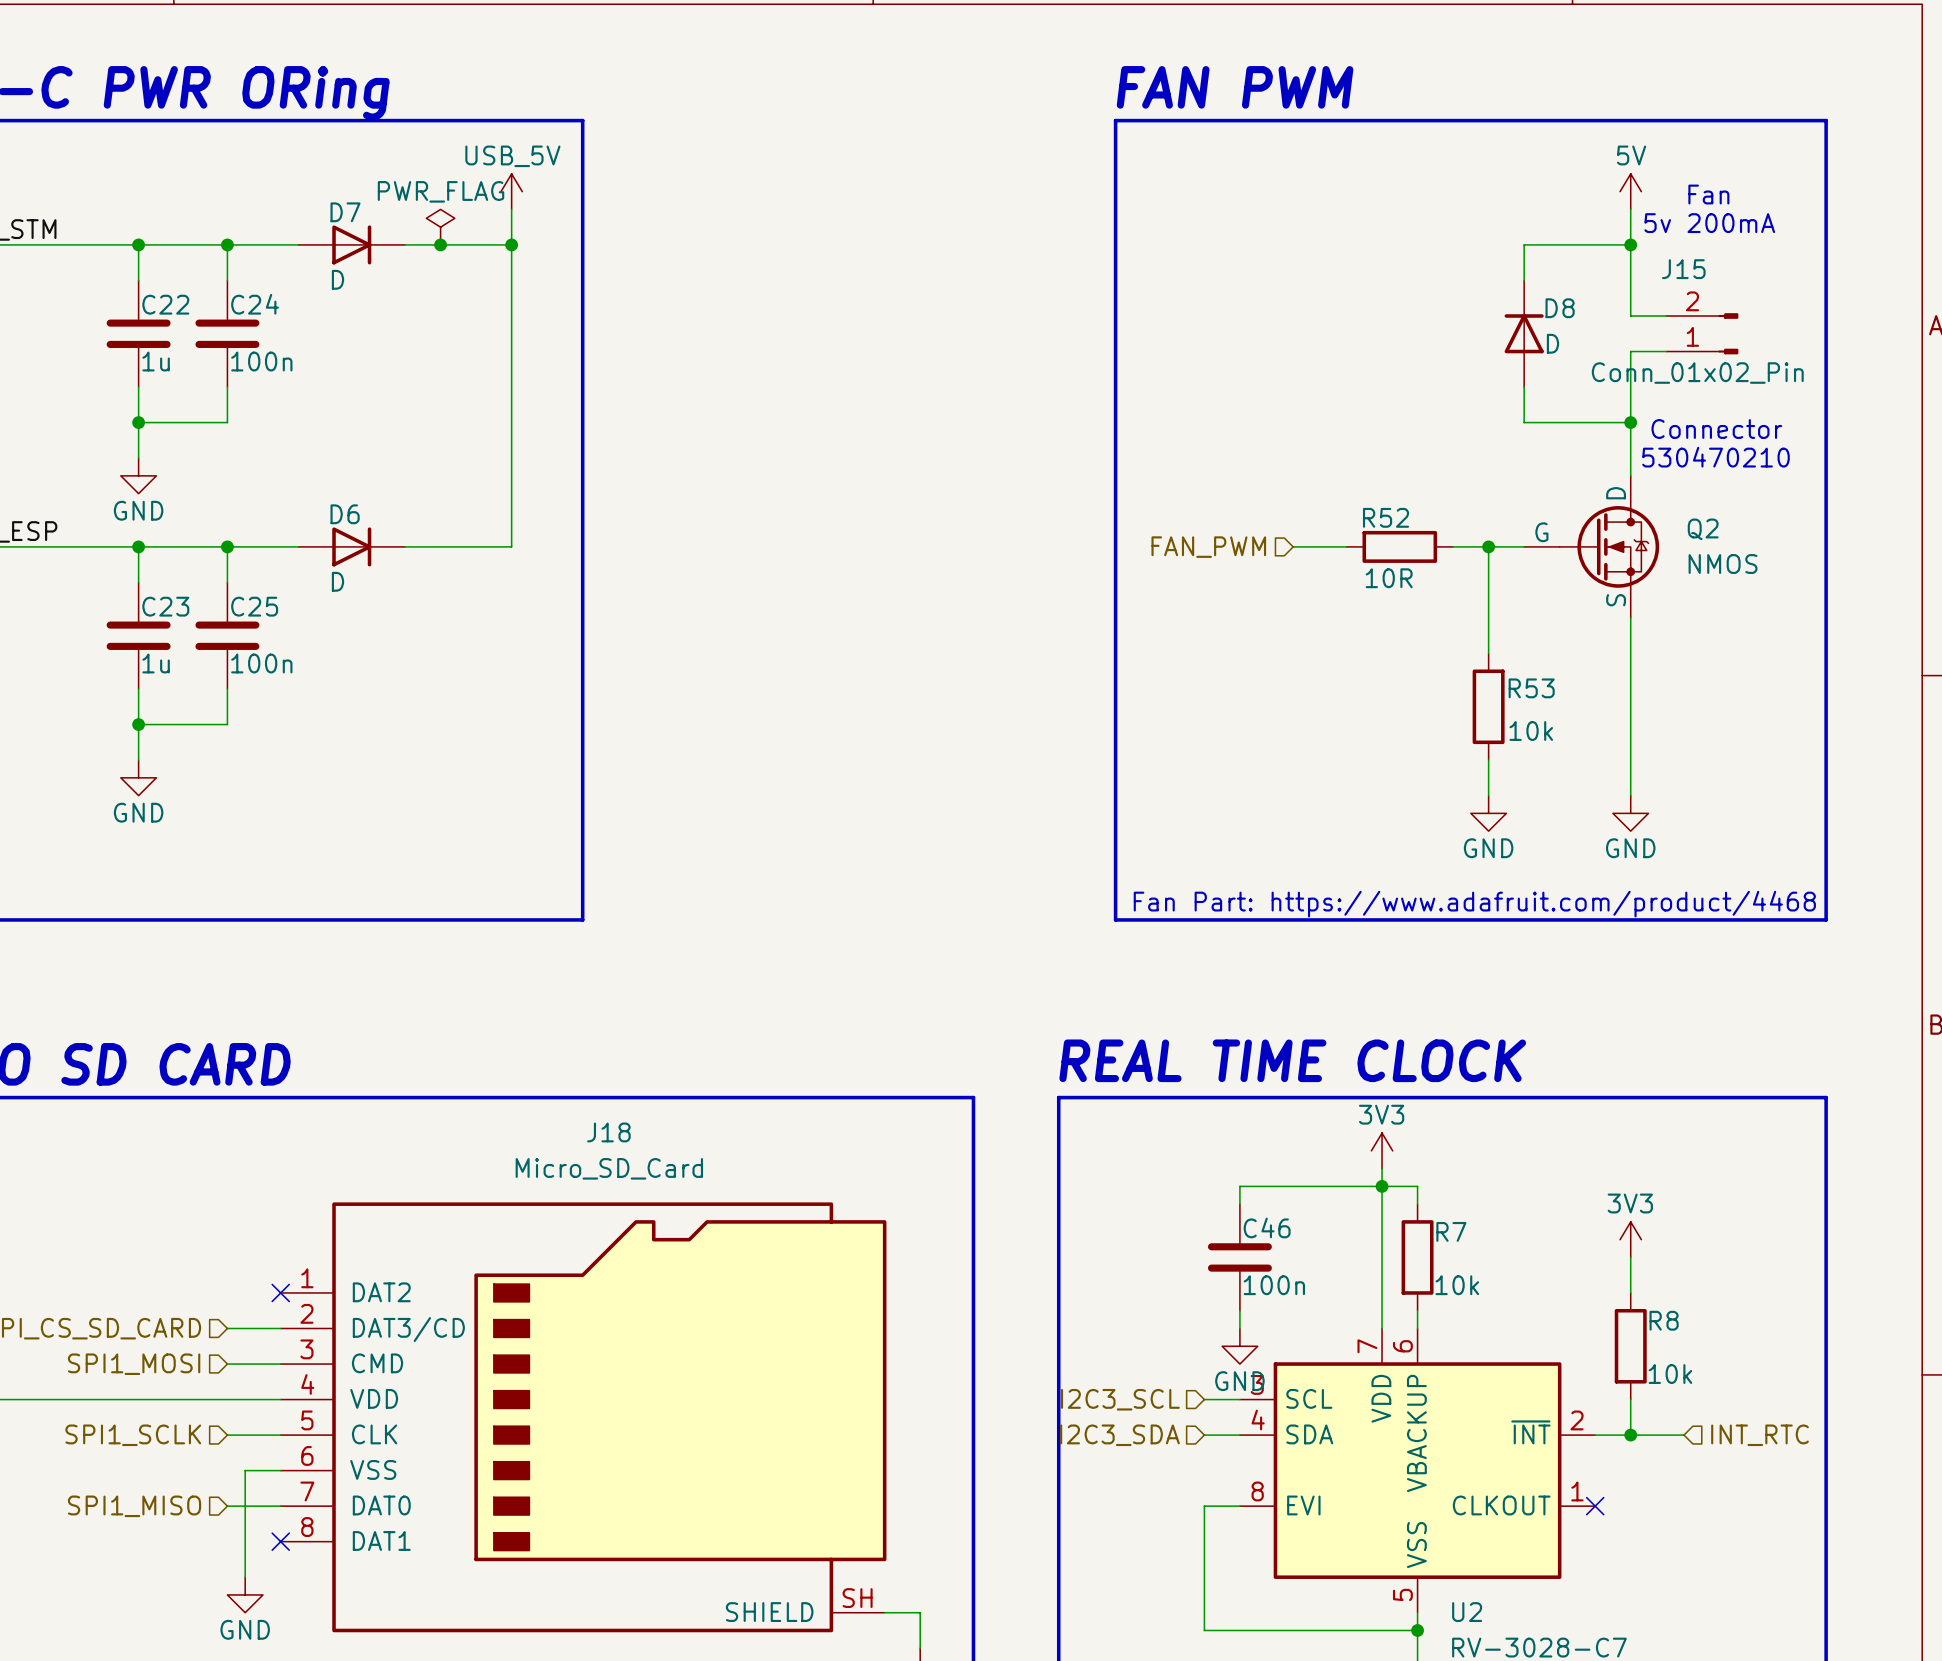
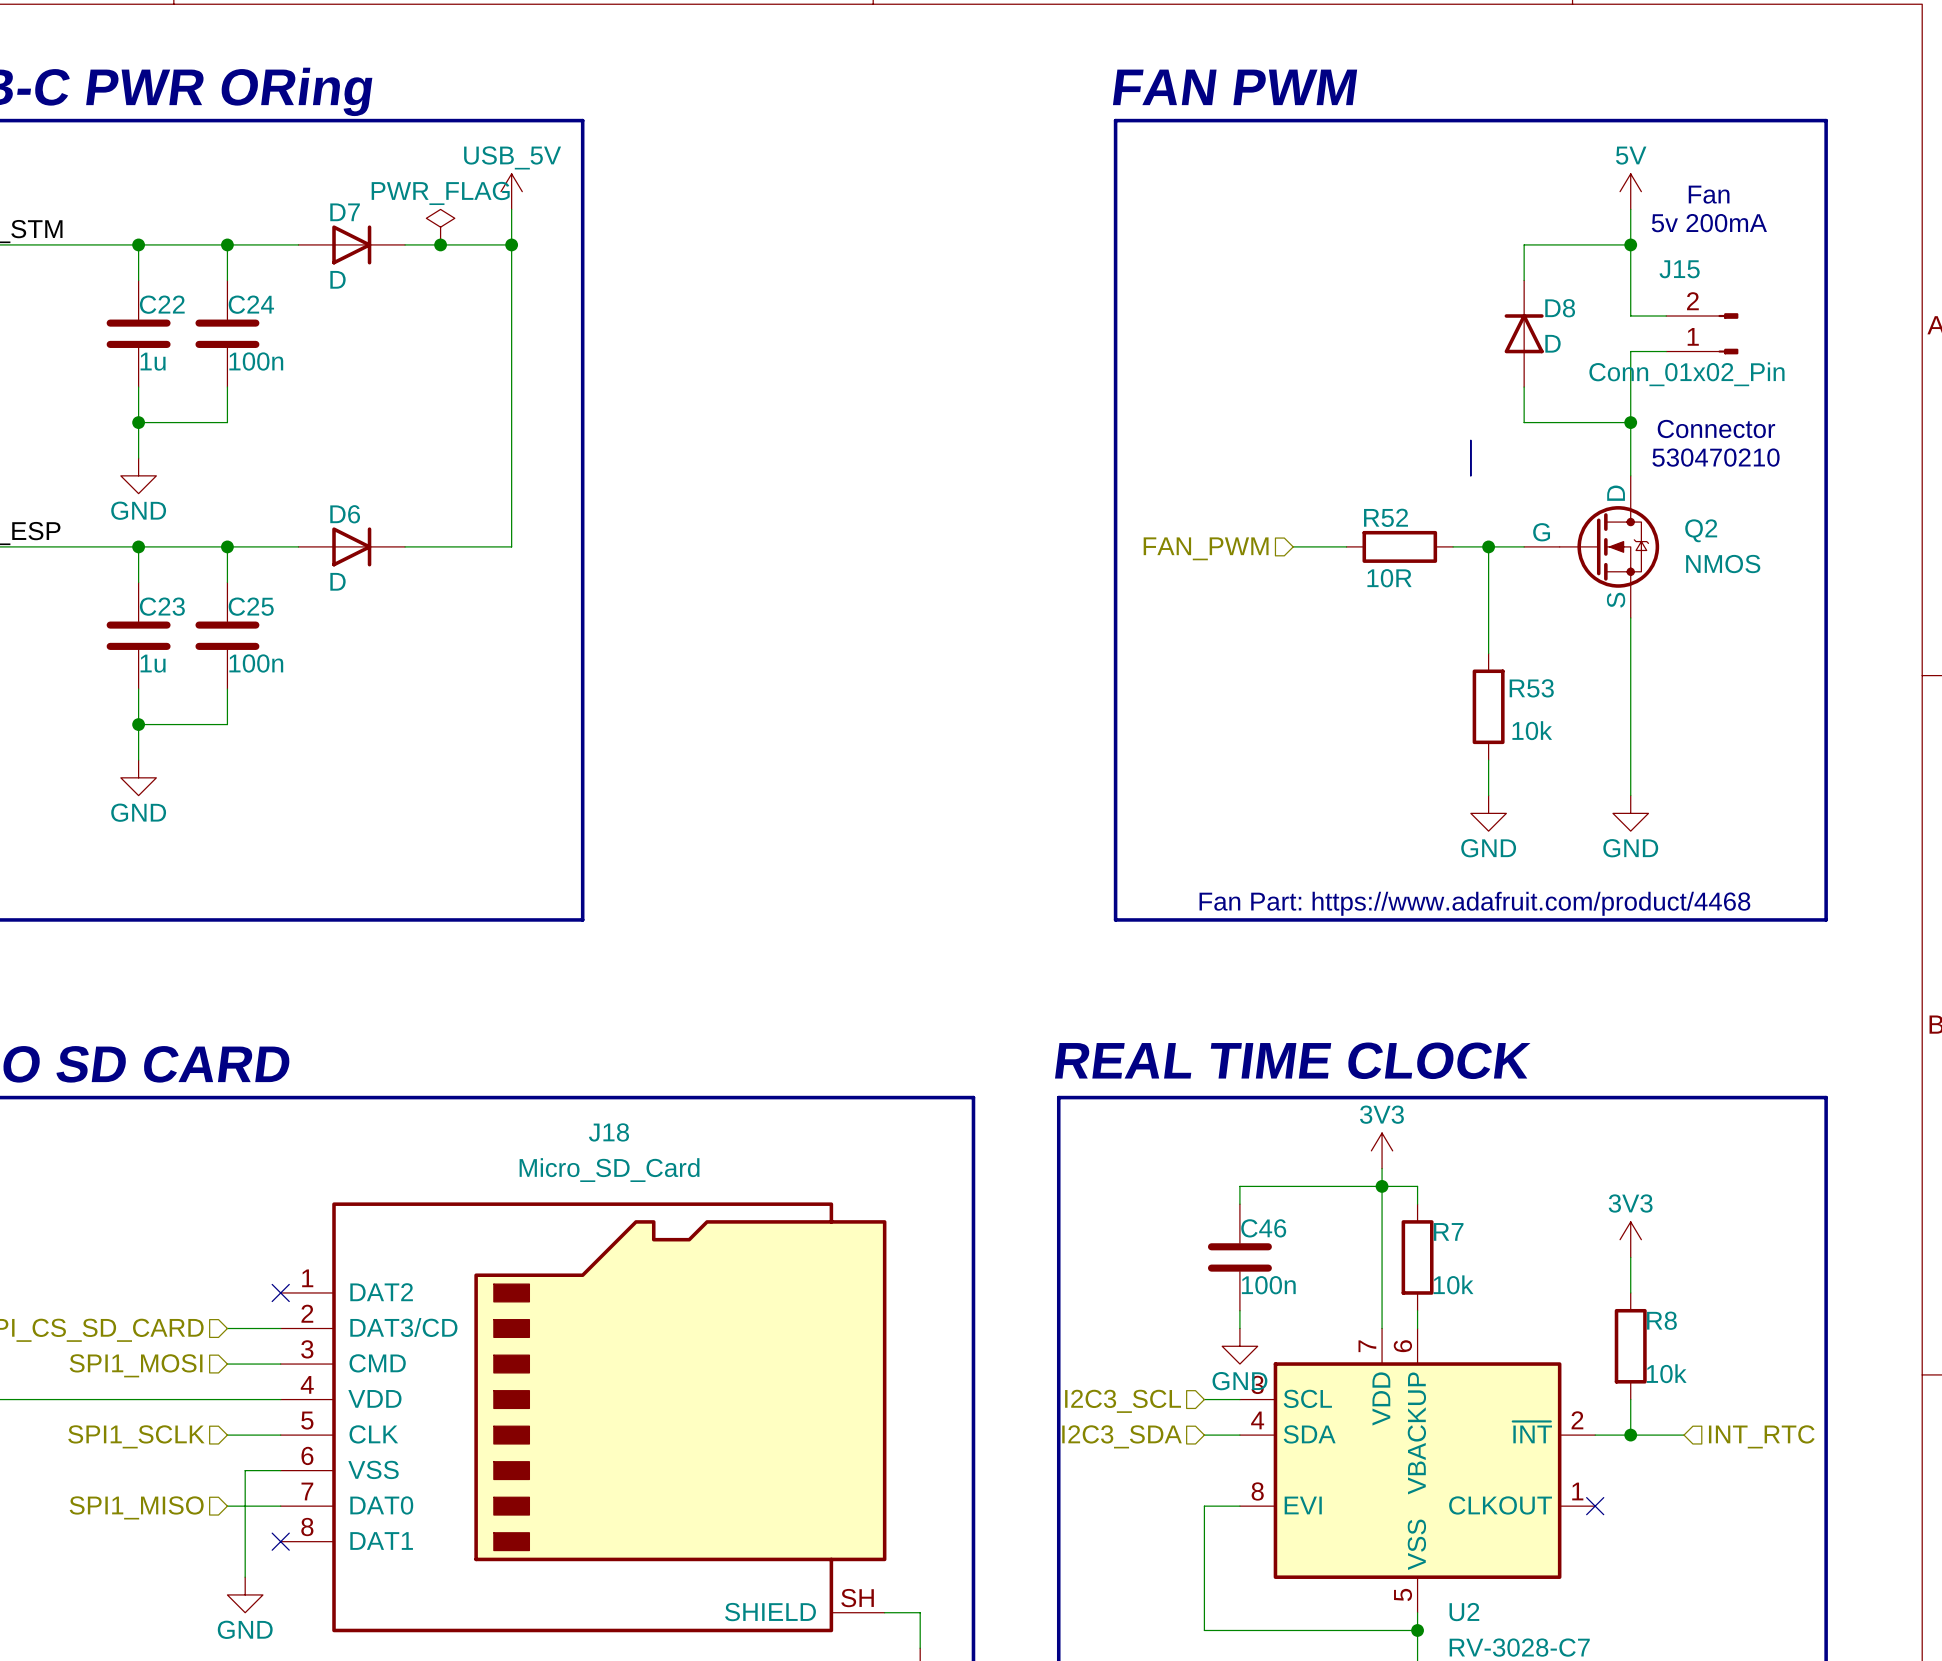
line: none -> (1470, 440) (1470, 475)

